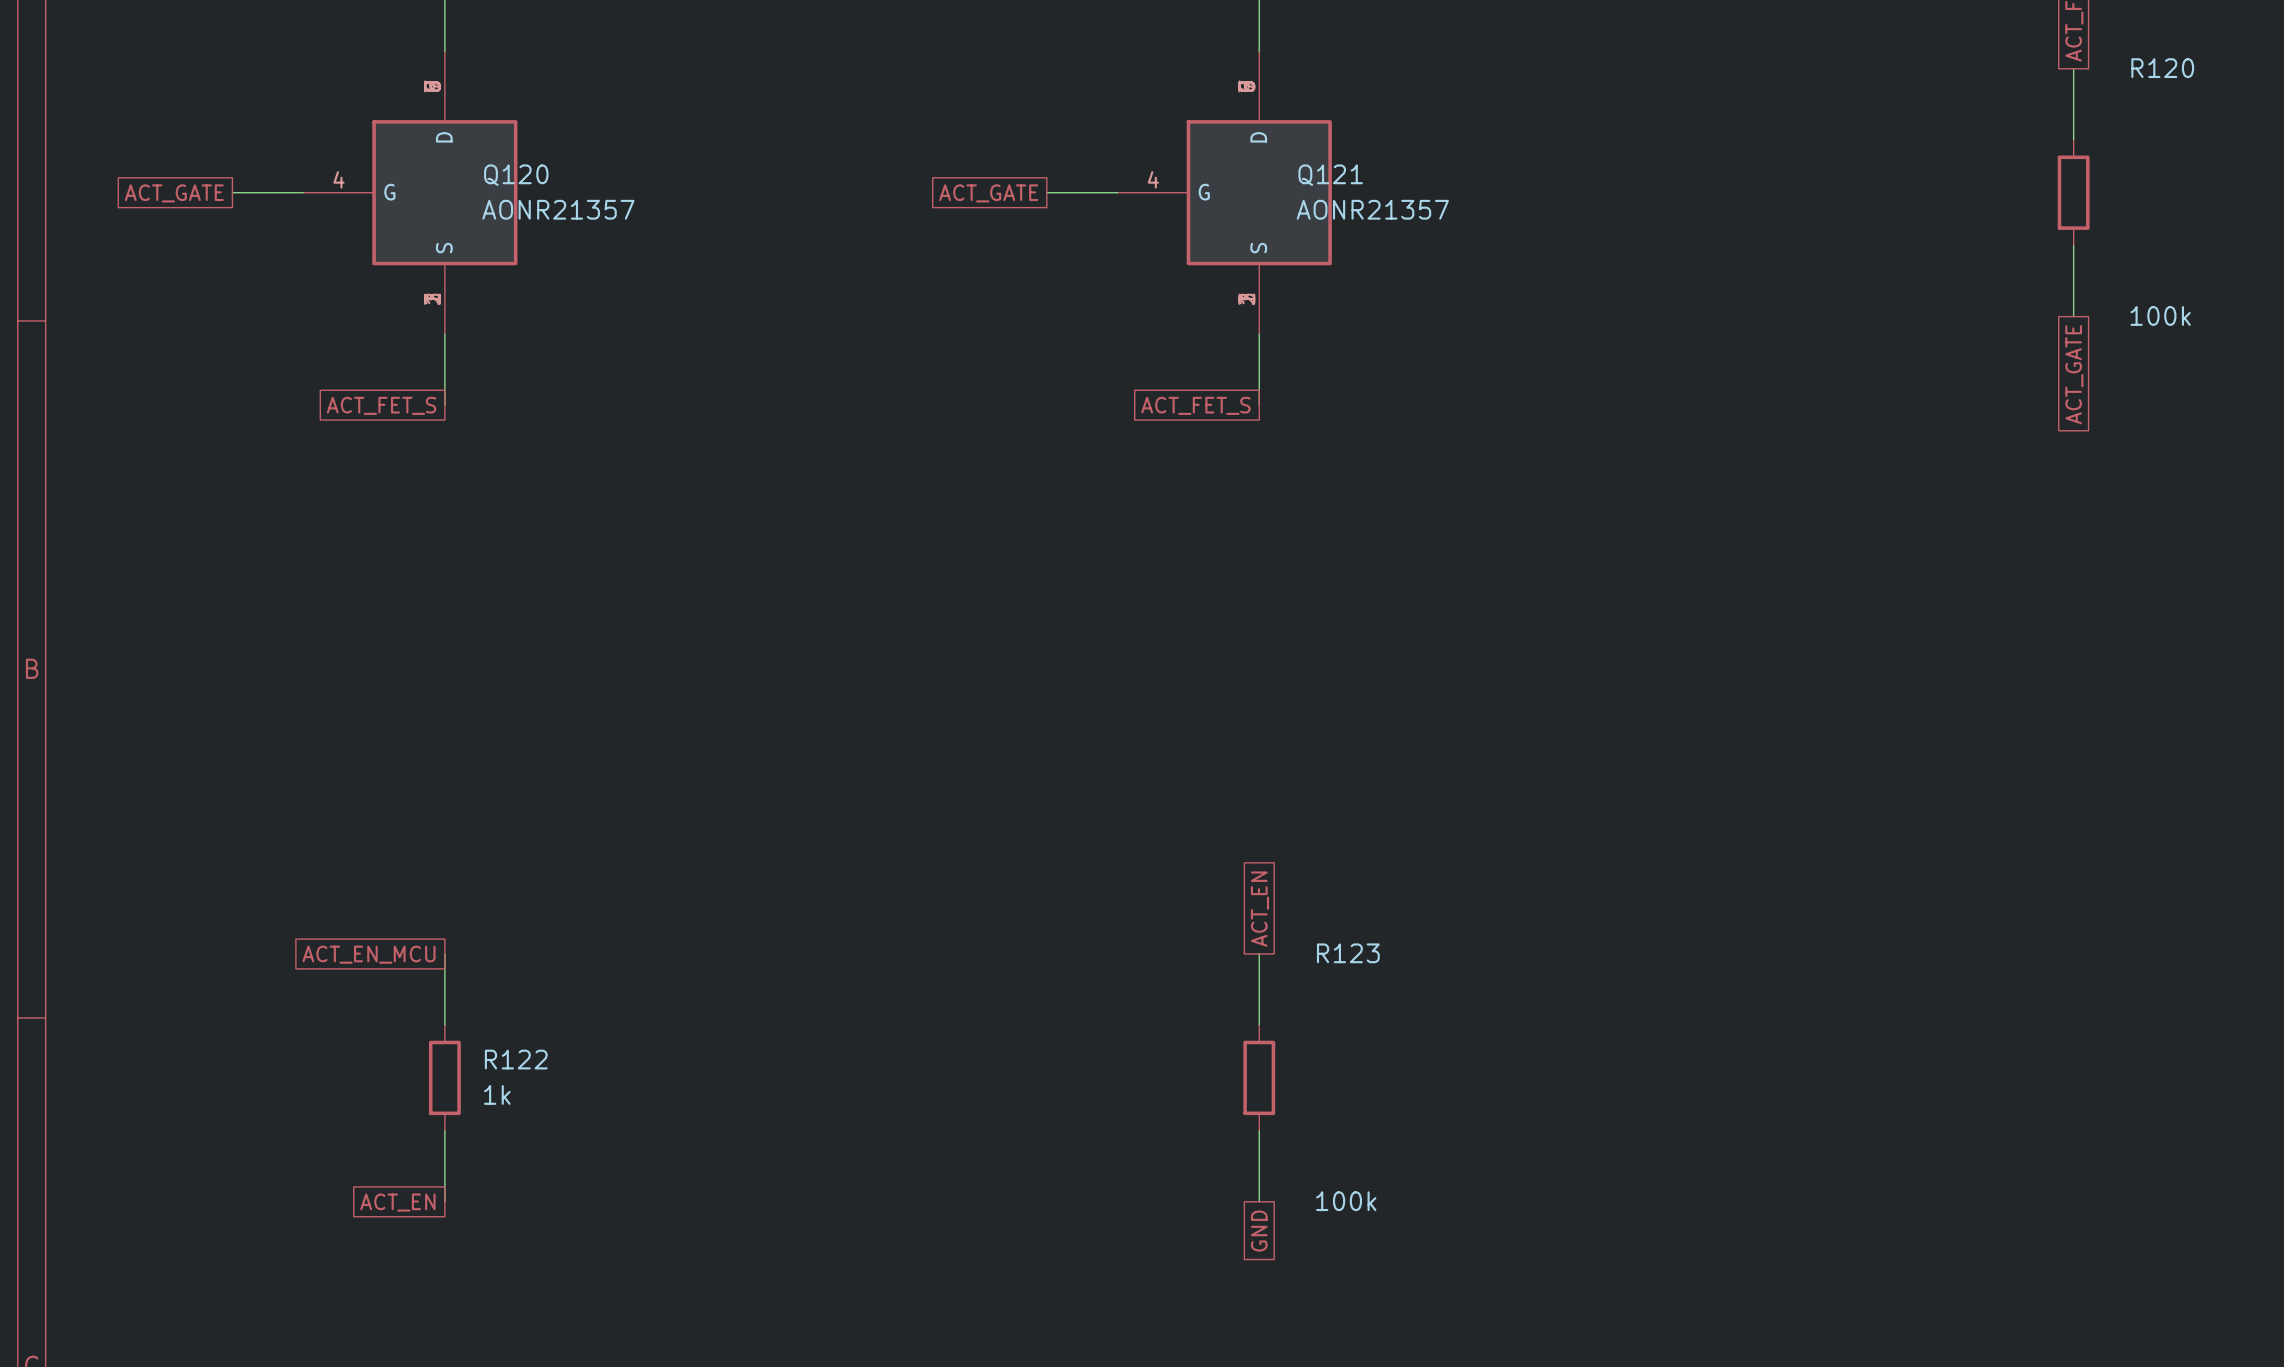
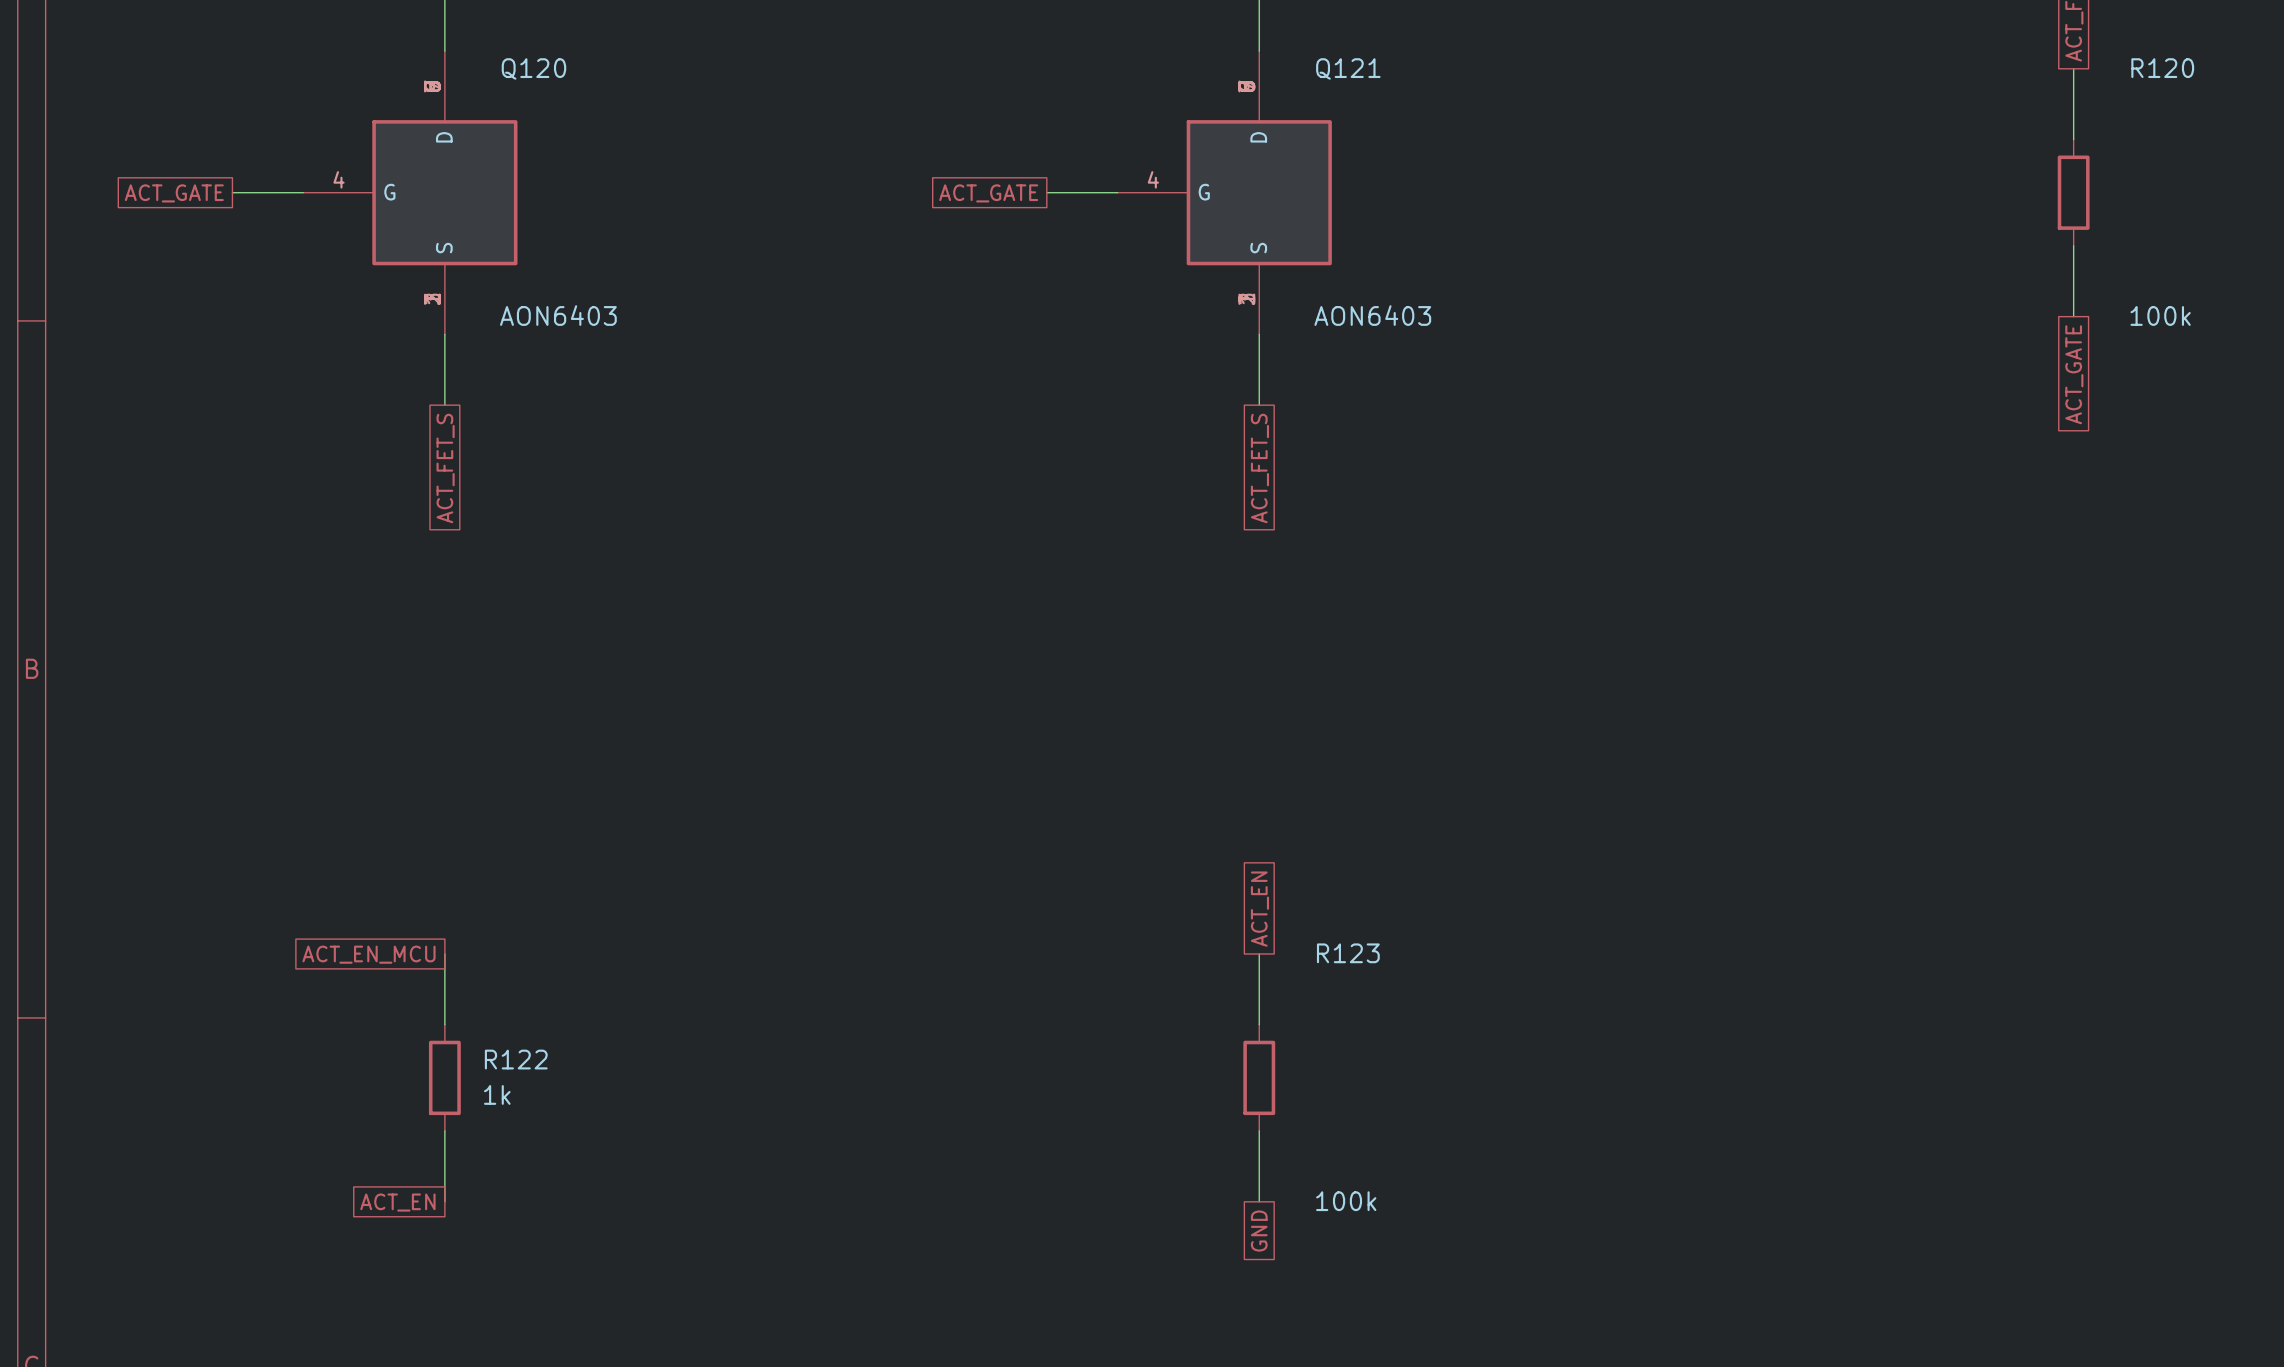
Q120 name position: Q120 (516, 175) -> Q120 (533, 68)
Q121 name position: Q121 (1330, 175) -> Q121 (1348, 68)
Q120 value: AONR21357 (558, 209) -> AON6403 (558, 315)
Q121 value: AONR21357 (1372, 209) -> AON6403 (1372, 315)
global label rotation: 0° (381, 405) -> 90° counterclockwise (445, 468)
global label rotation: 0° (1195, 405) -> 90° counterclockwise (1259, 468)

